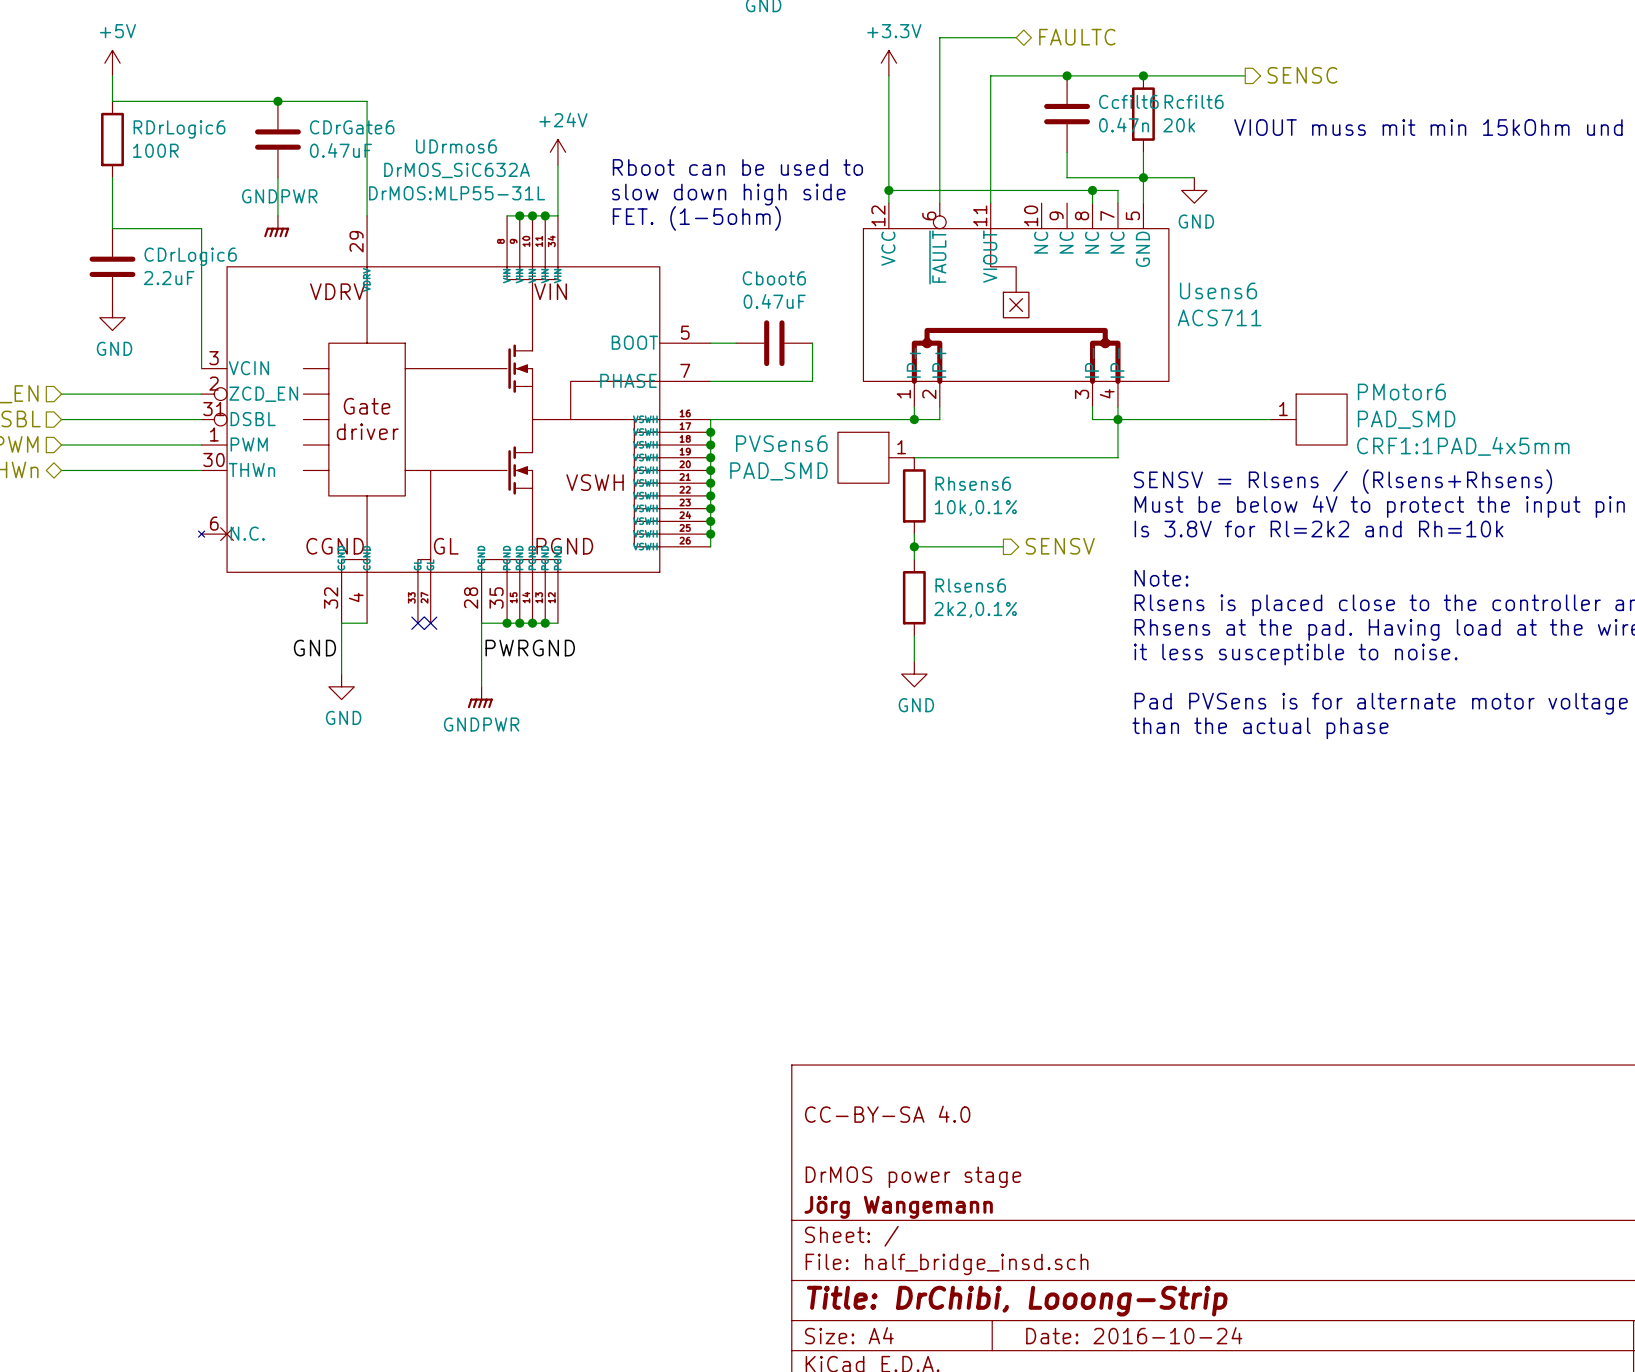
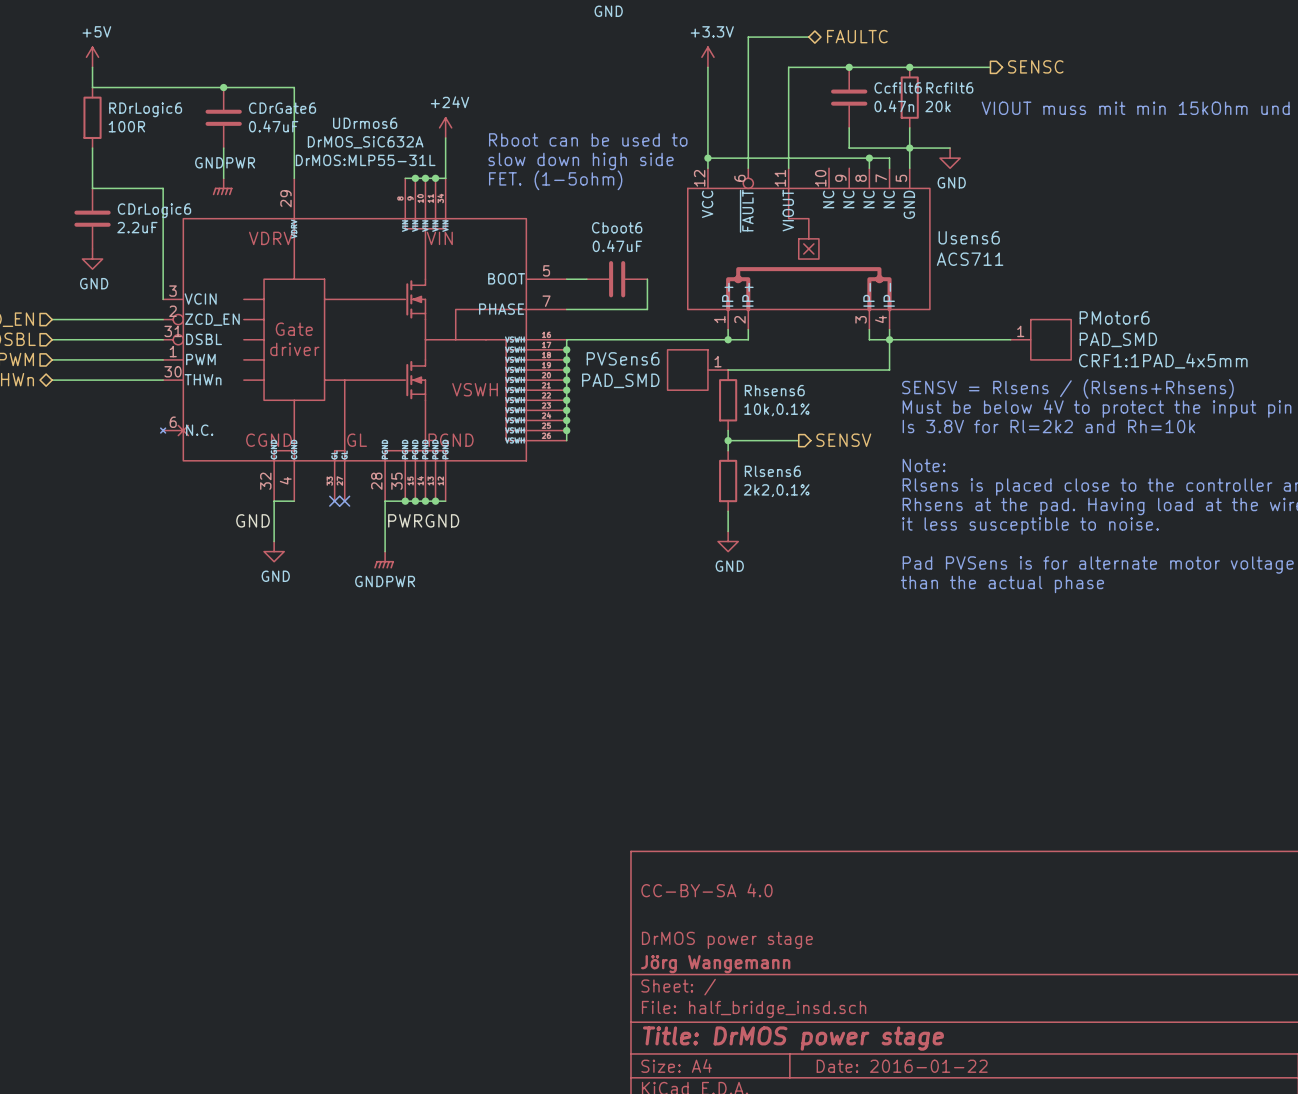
title block: Title: DrChibi, Looong-Strip (1017, 1301) -> Title: DrMOS power stage (793, 1038)
title block: Date: 2016-10-24 (1134, 1335) -> Date: 2016-01-22 (902, 1066)

